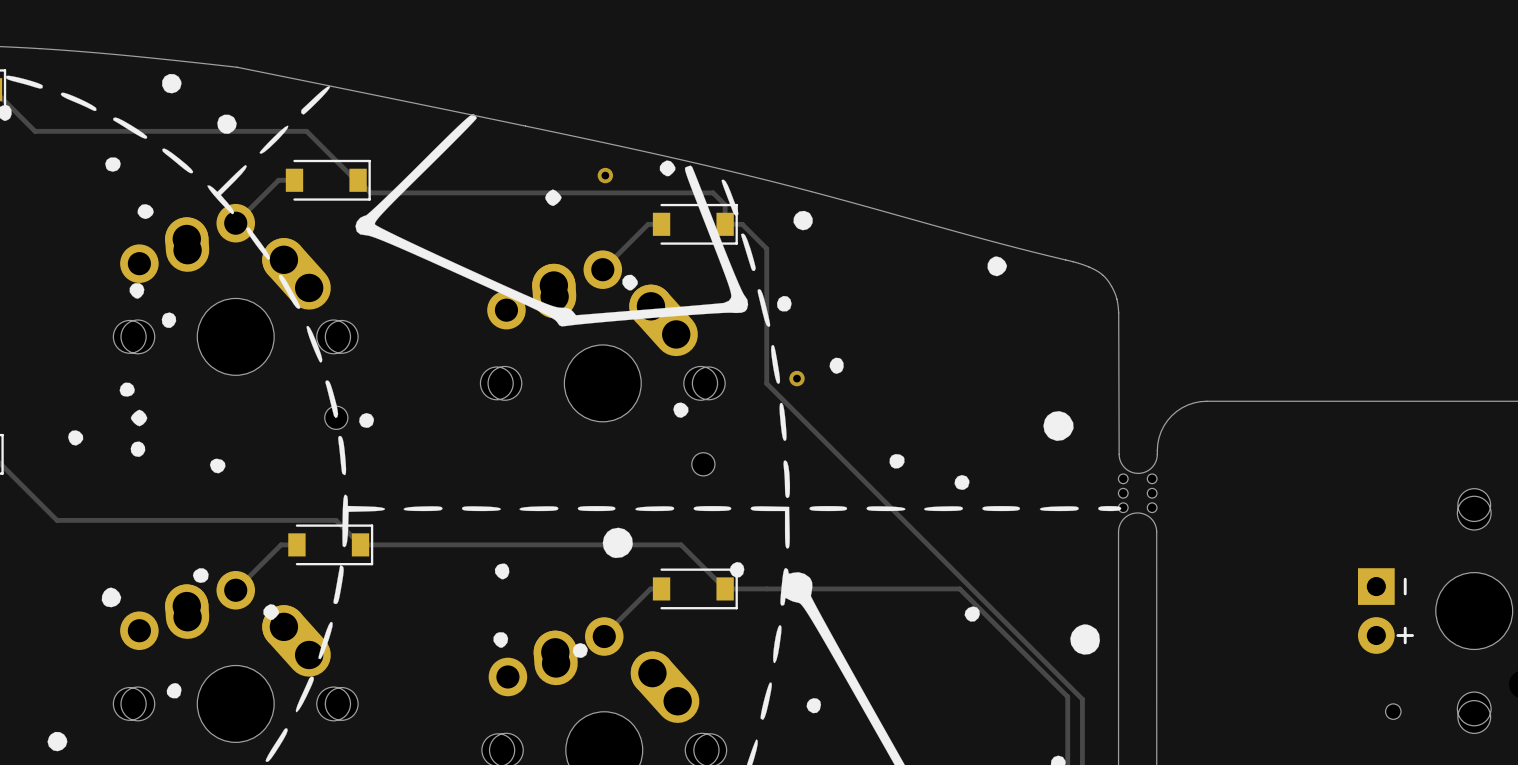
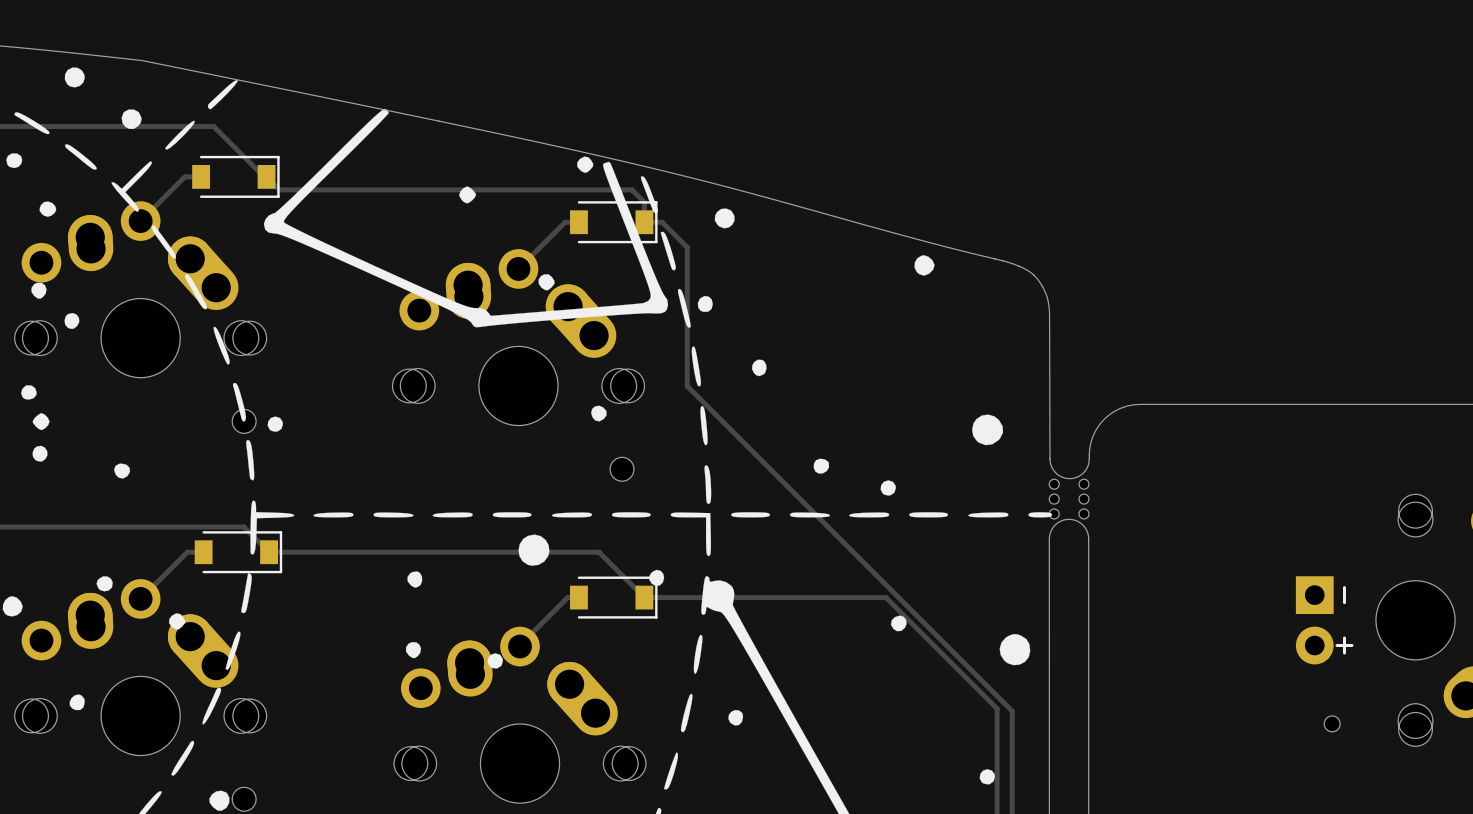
via: (605, 175) -> none
via: (797, 378) -> none

